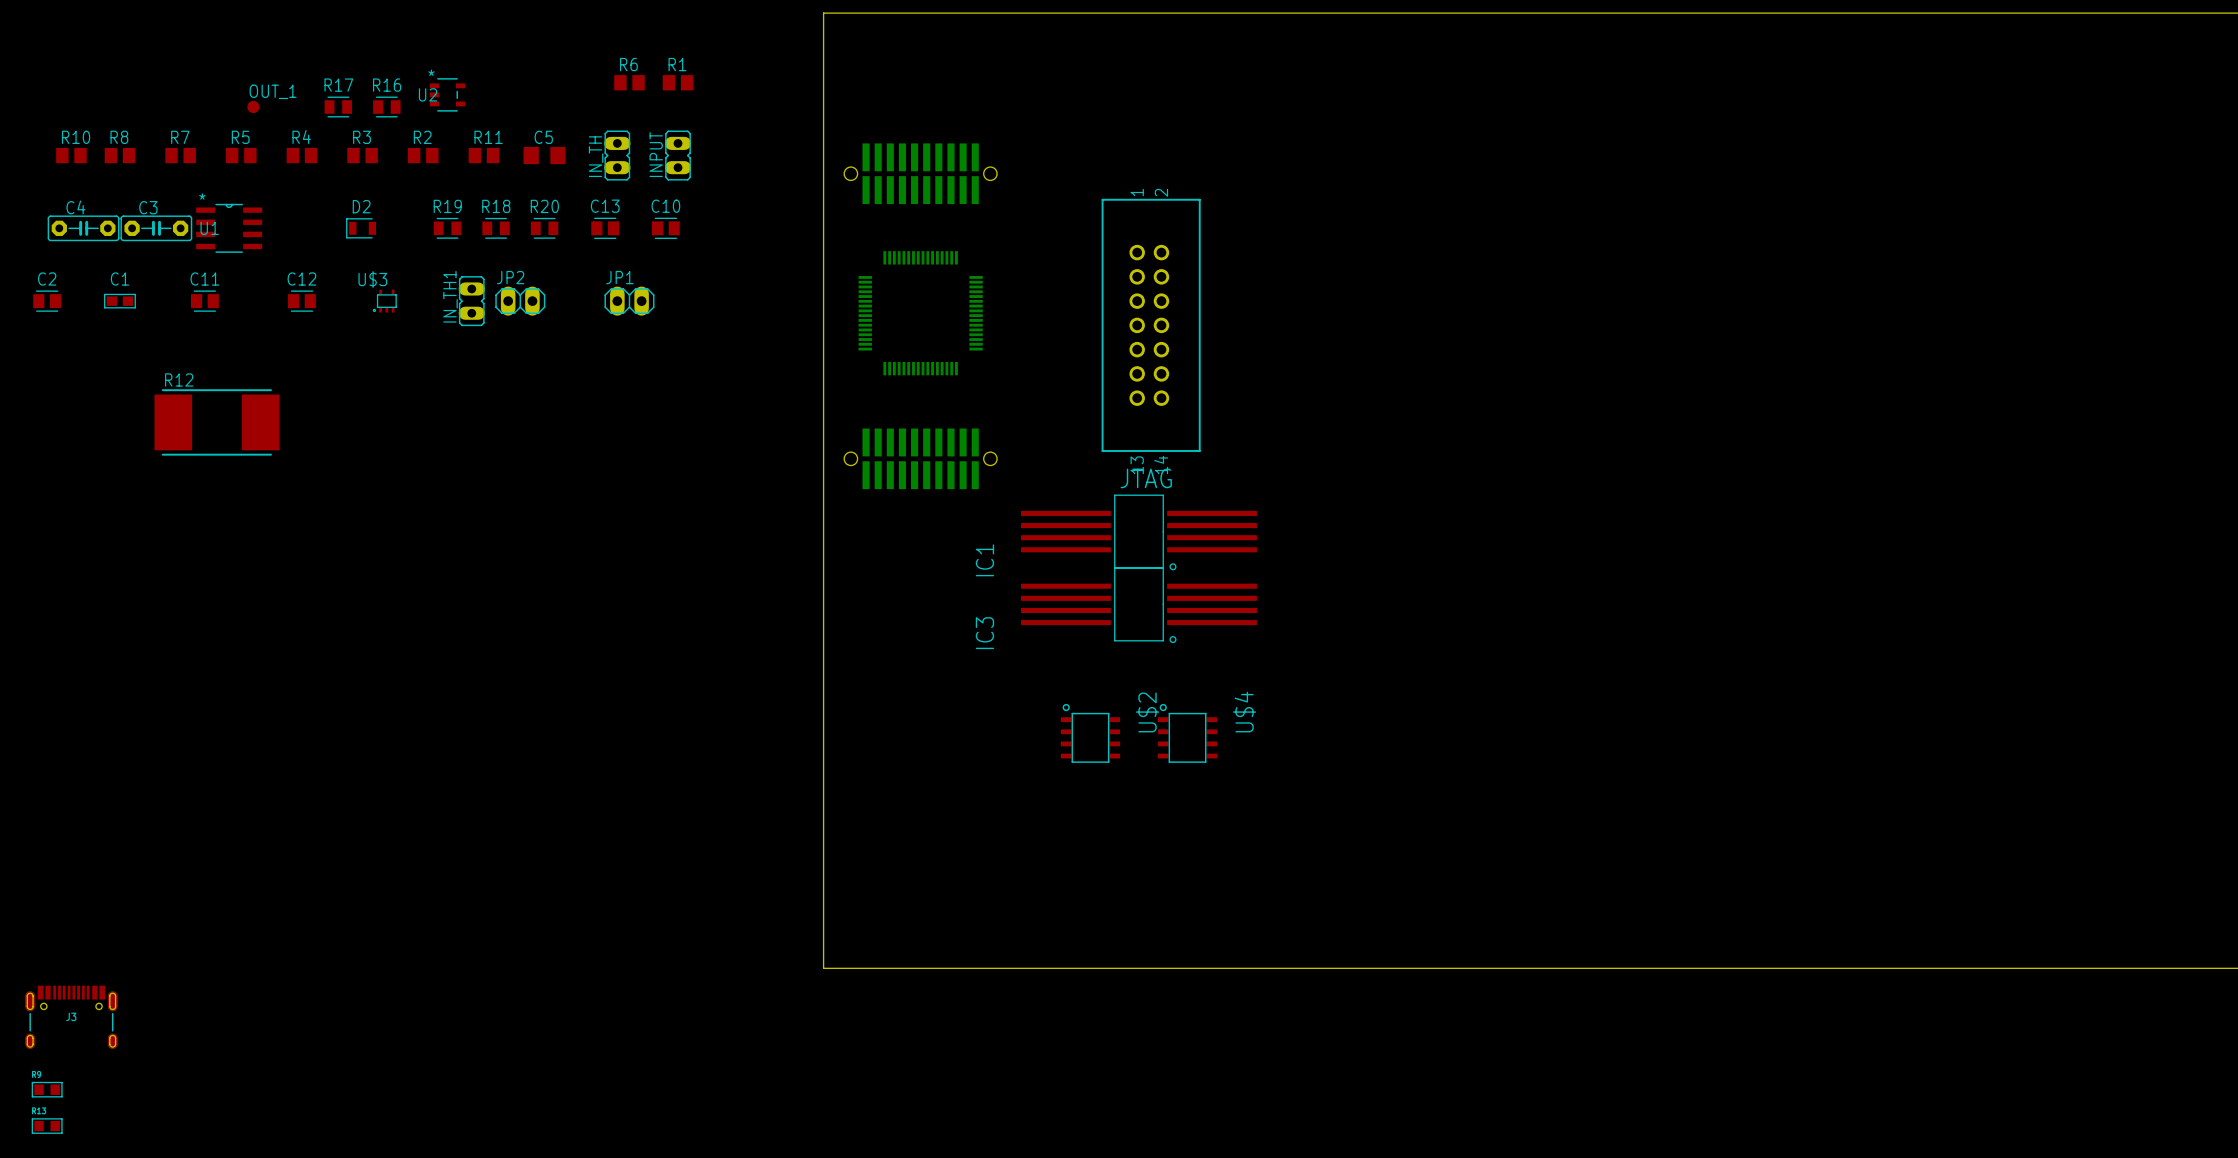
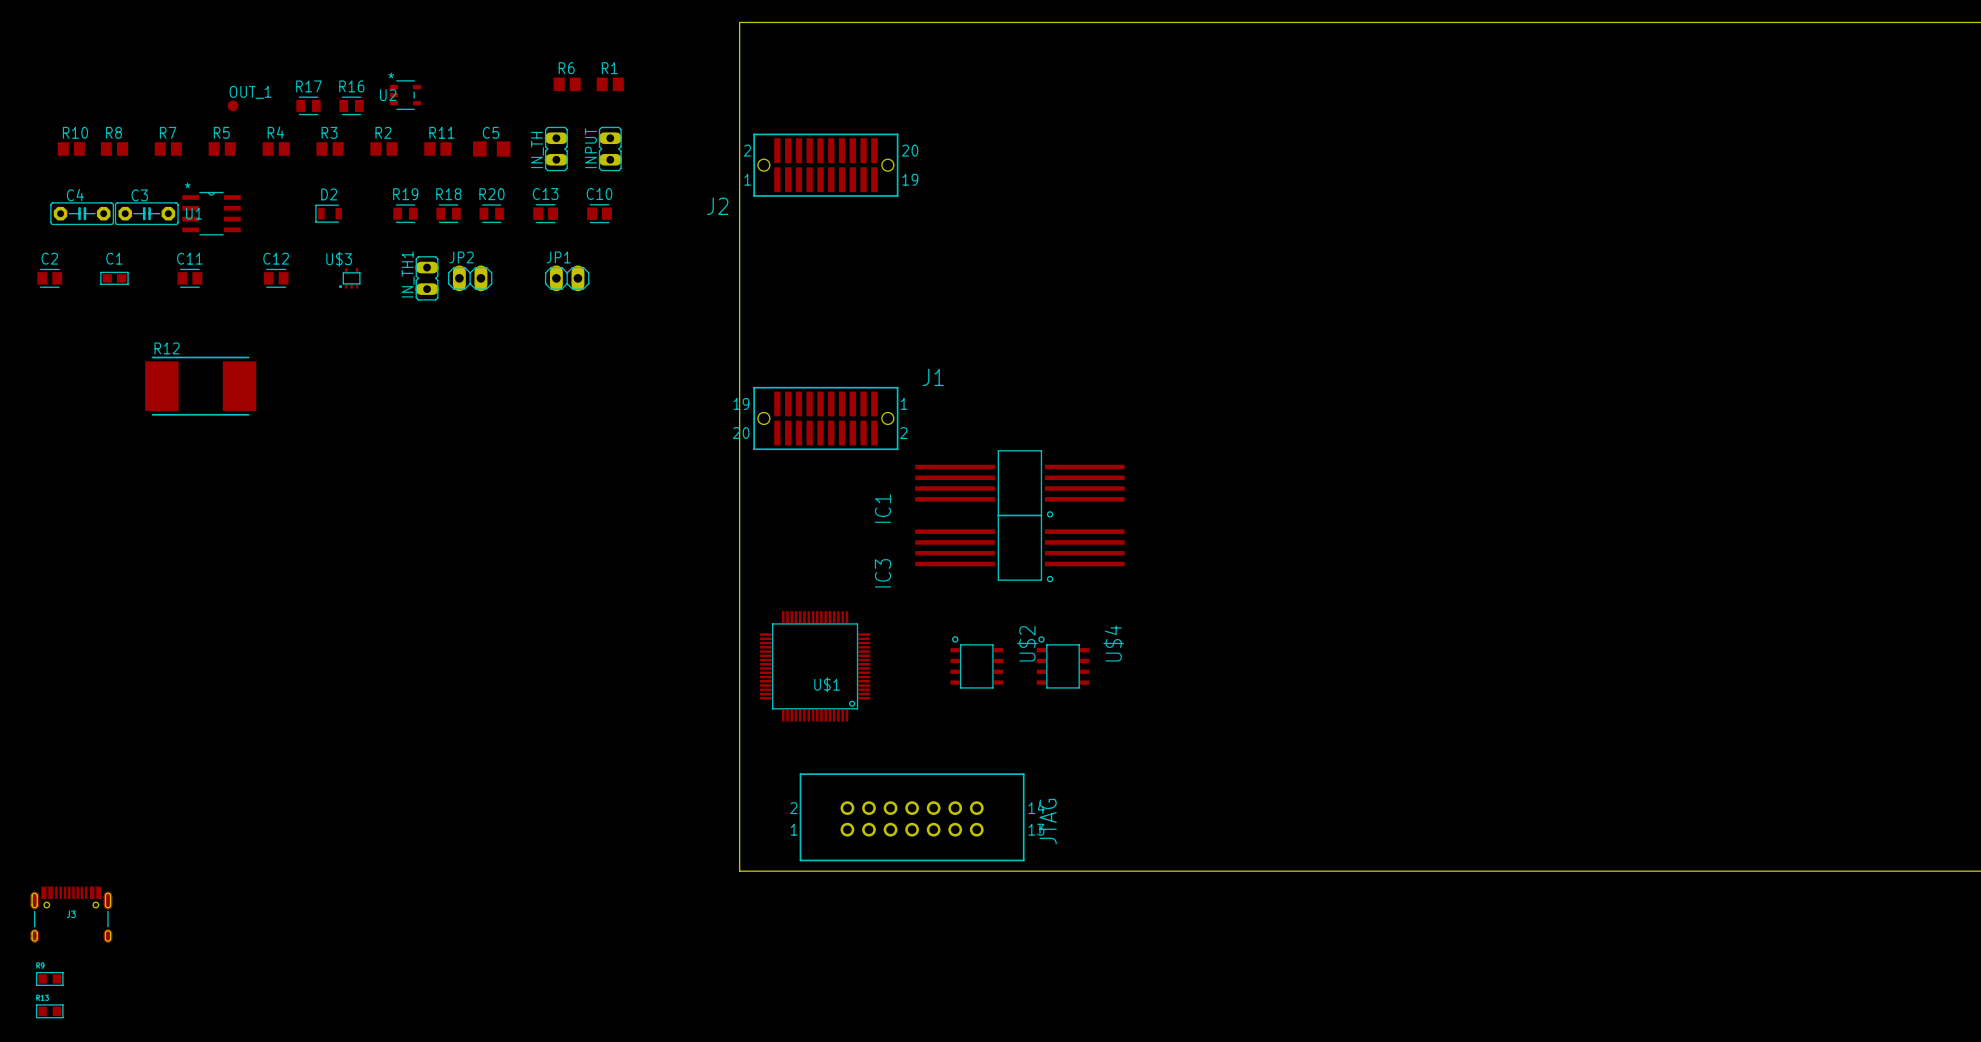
J2 side: bottom (920, 173) -> top (825, 165)
part: (920, 313) -> none
JTAG: (1151, 325) -> none
J1 side: bottom (920, 458) -> top (825, 418)
U$1: none -> (815, 666)
JTAG: none -> (912, 817)

